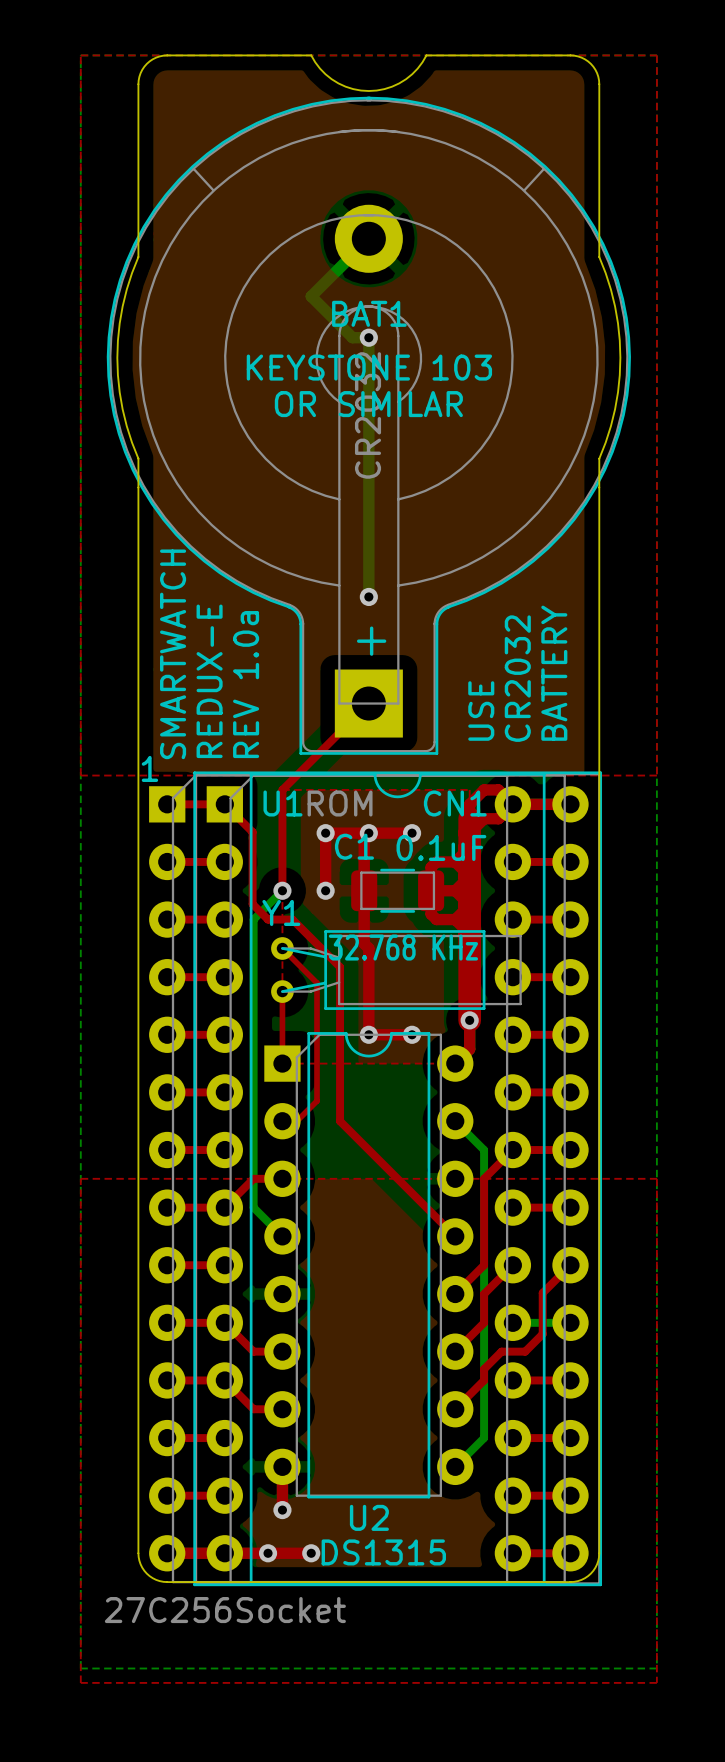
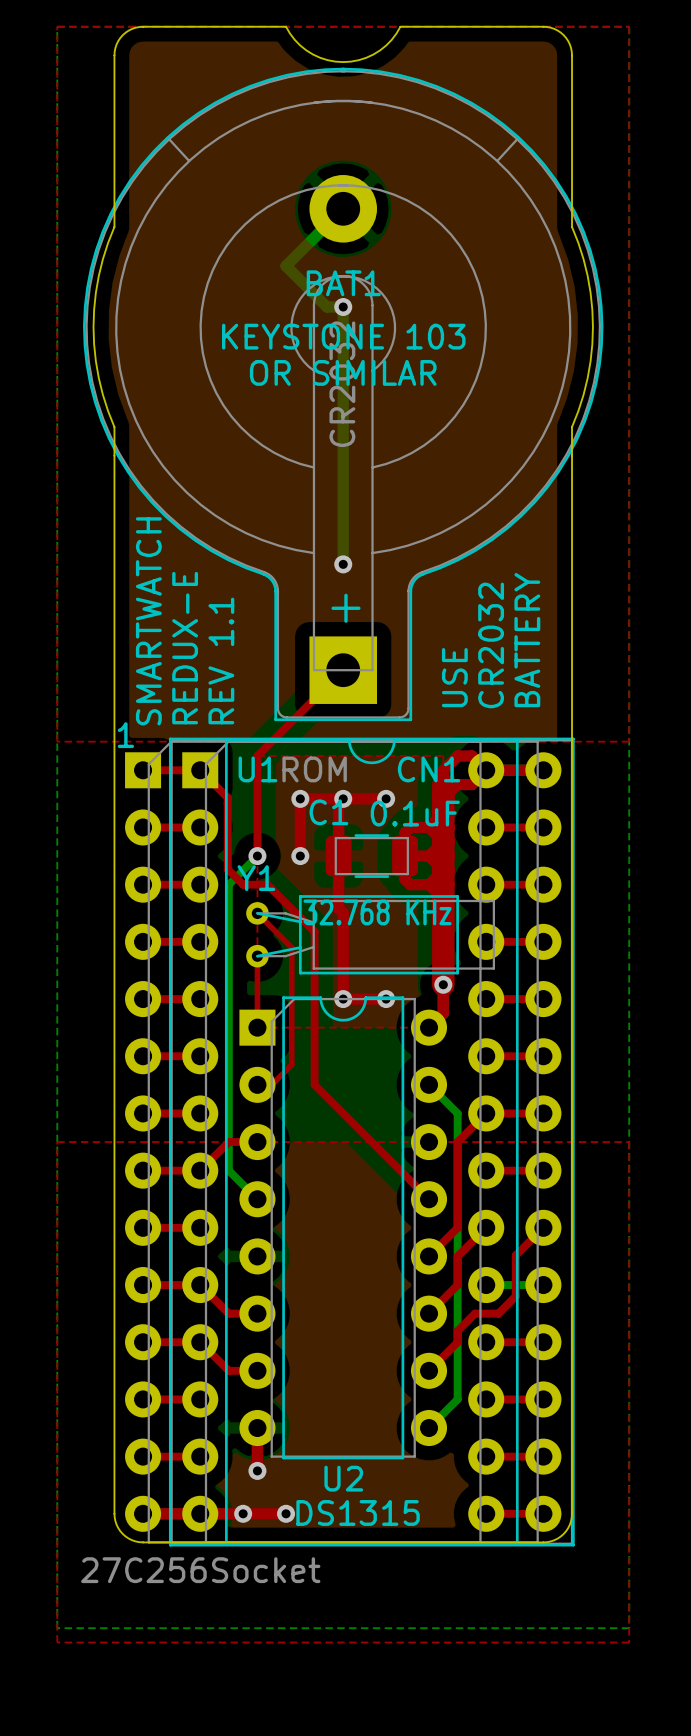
text: REV 1.0a (246, 684) -> REV 1.1 (221, 661)

